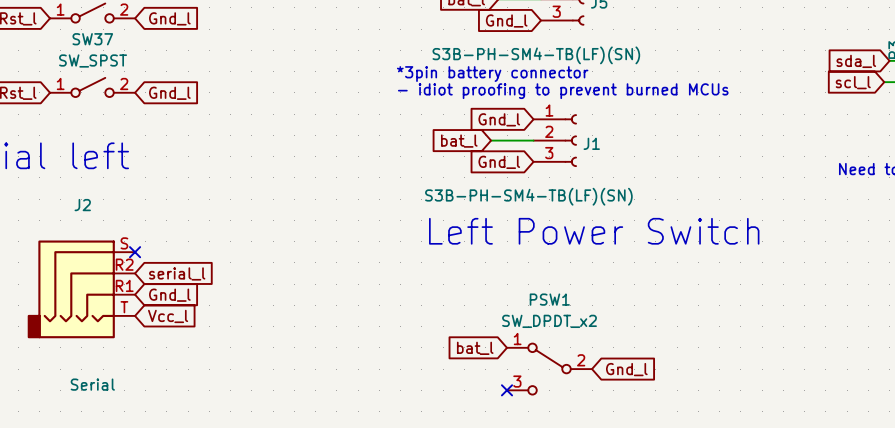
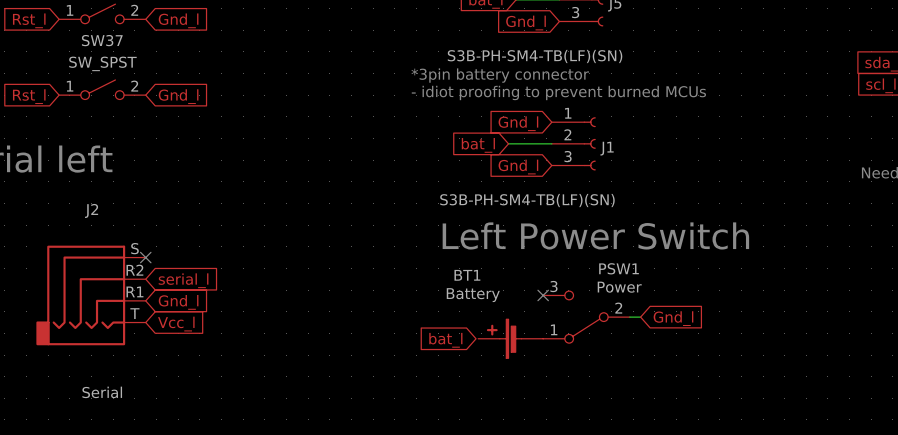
no-connect mark: none -> (543, 295)
PSW1 name position: PSW1 (549, 299) -> PSW1 (619, 268)
wire: none -> (629, 317) (640, 317)
PSW1 value: SW_DPDT_x2 (549, 321) -> Power (619, 287)
BT1: none -> Battery (510, 338)
global label position: bat_l (475, 348) -> bat_l (445, 340)
PSW1 flip: as is (549, 369) -> up-down (586, 317)
PSW1 position: (549, 369) -> (586, 317)
global label position: Gnd_l (626, 369) -> Gnd_l (673, 318)
no-connect mark: (507, 390) -> none

